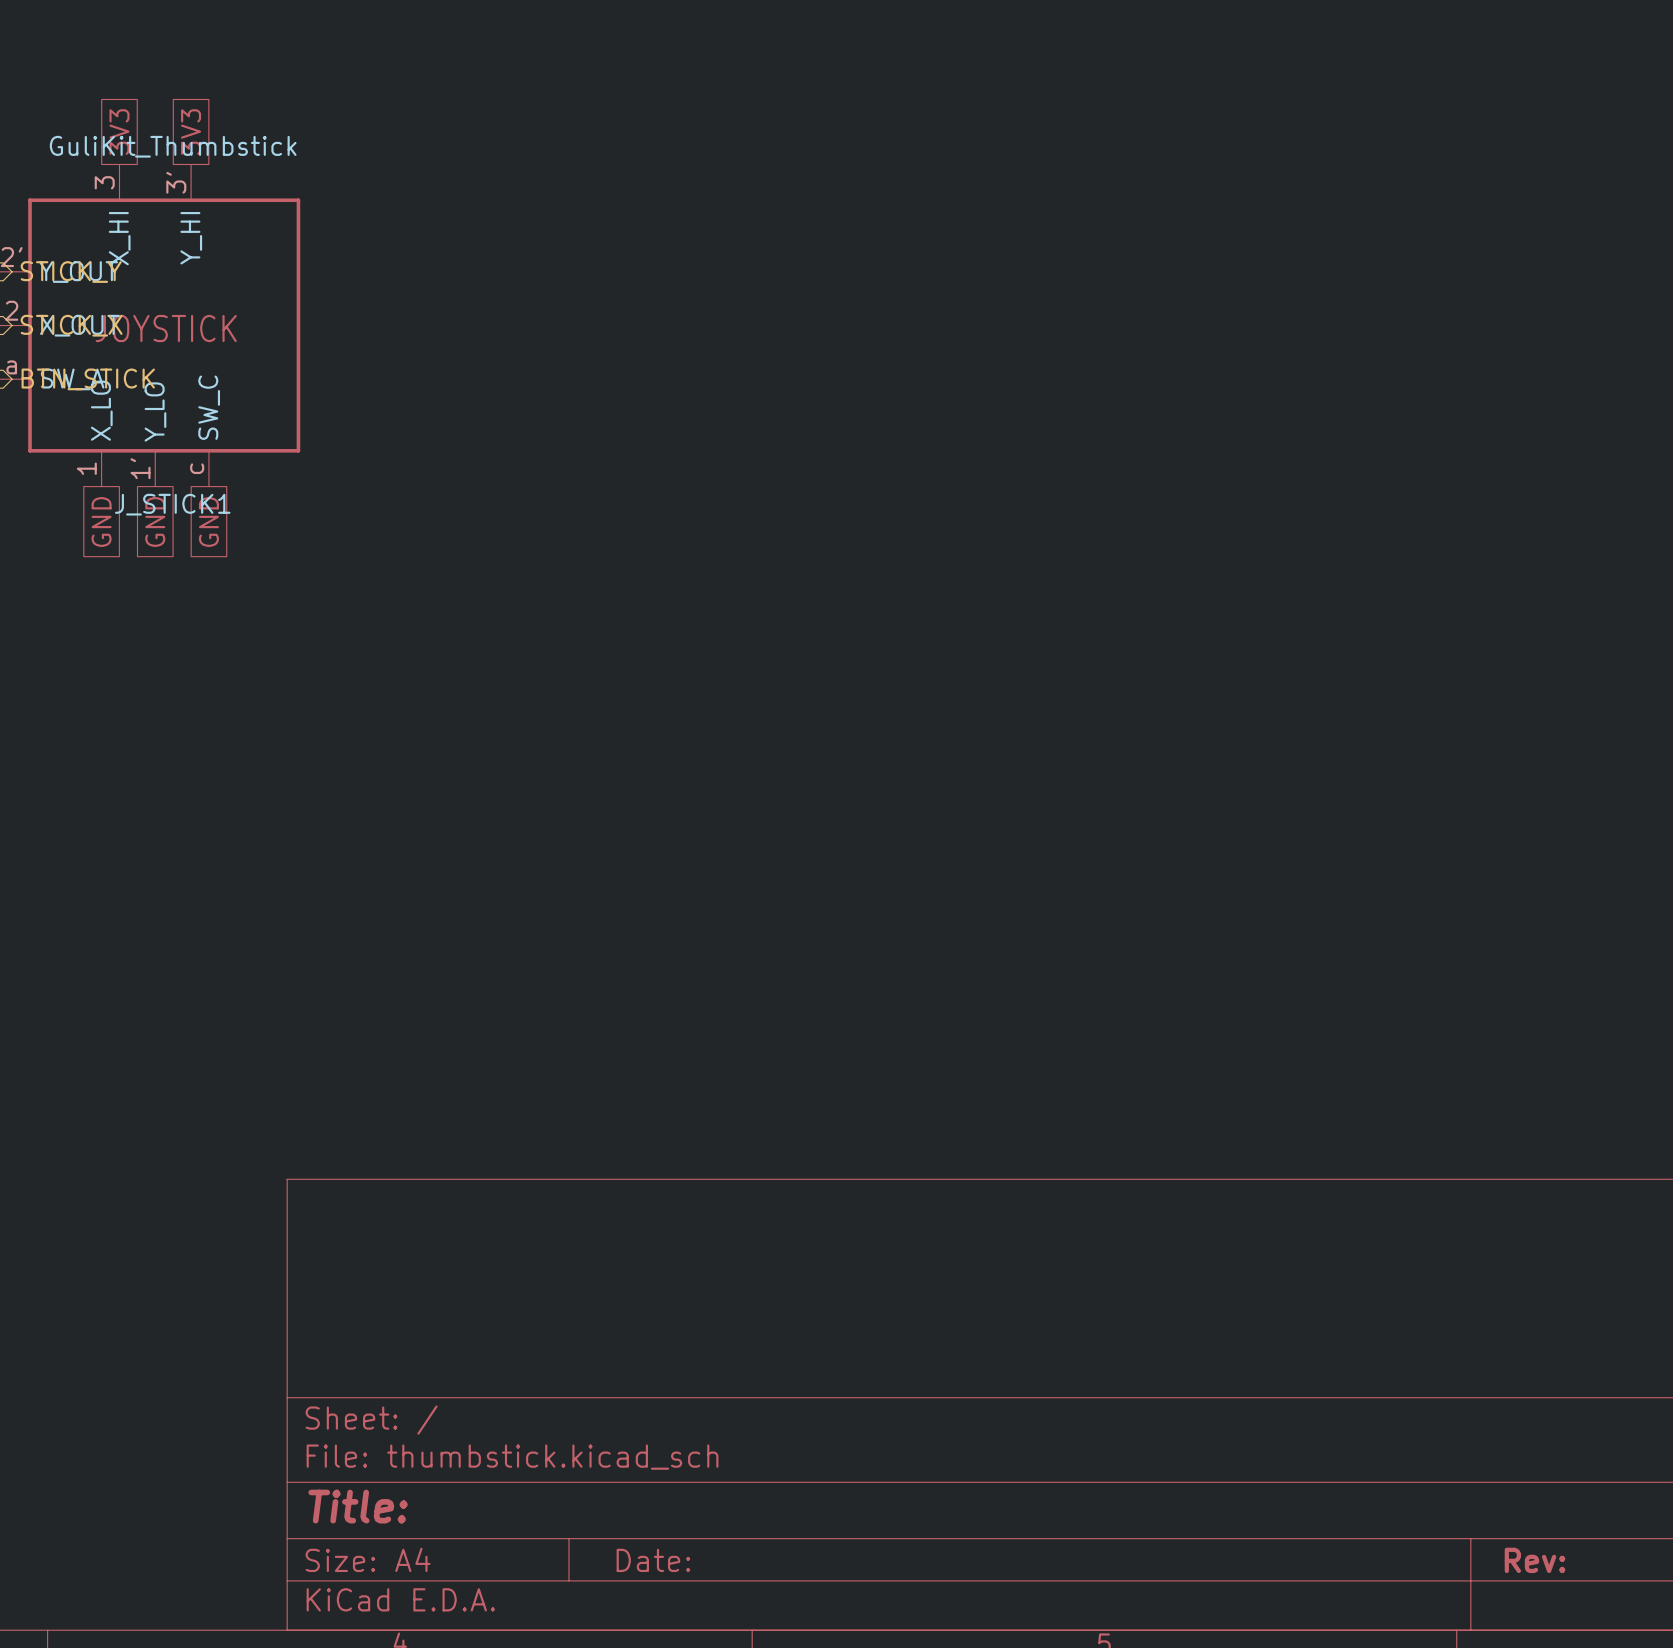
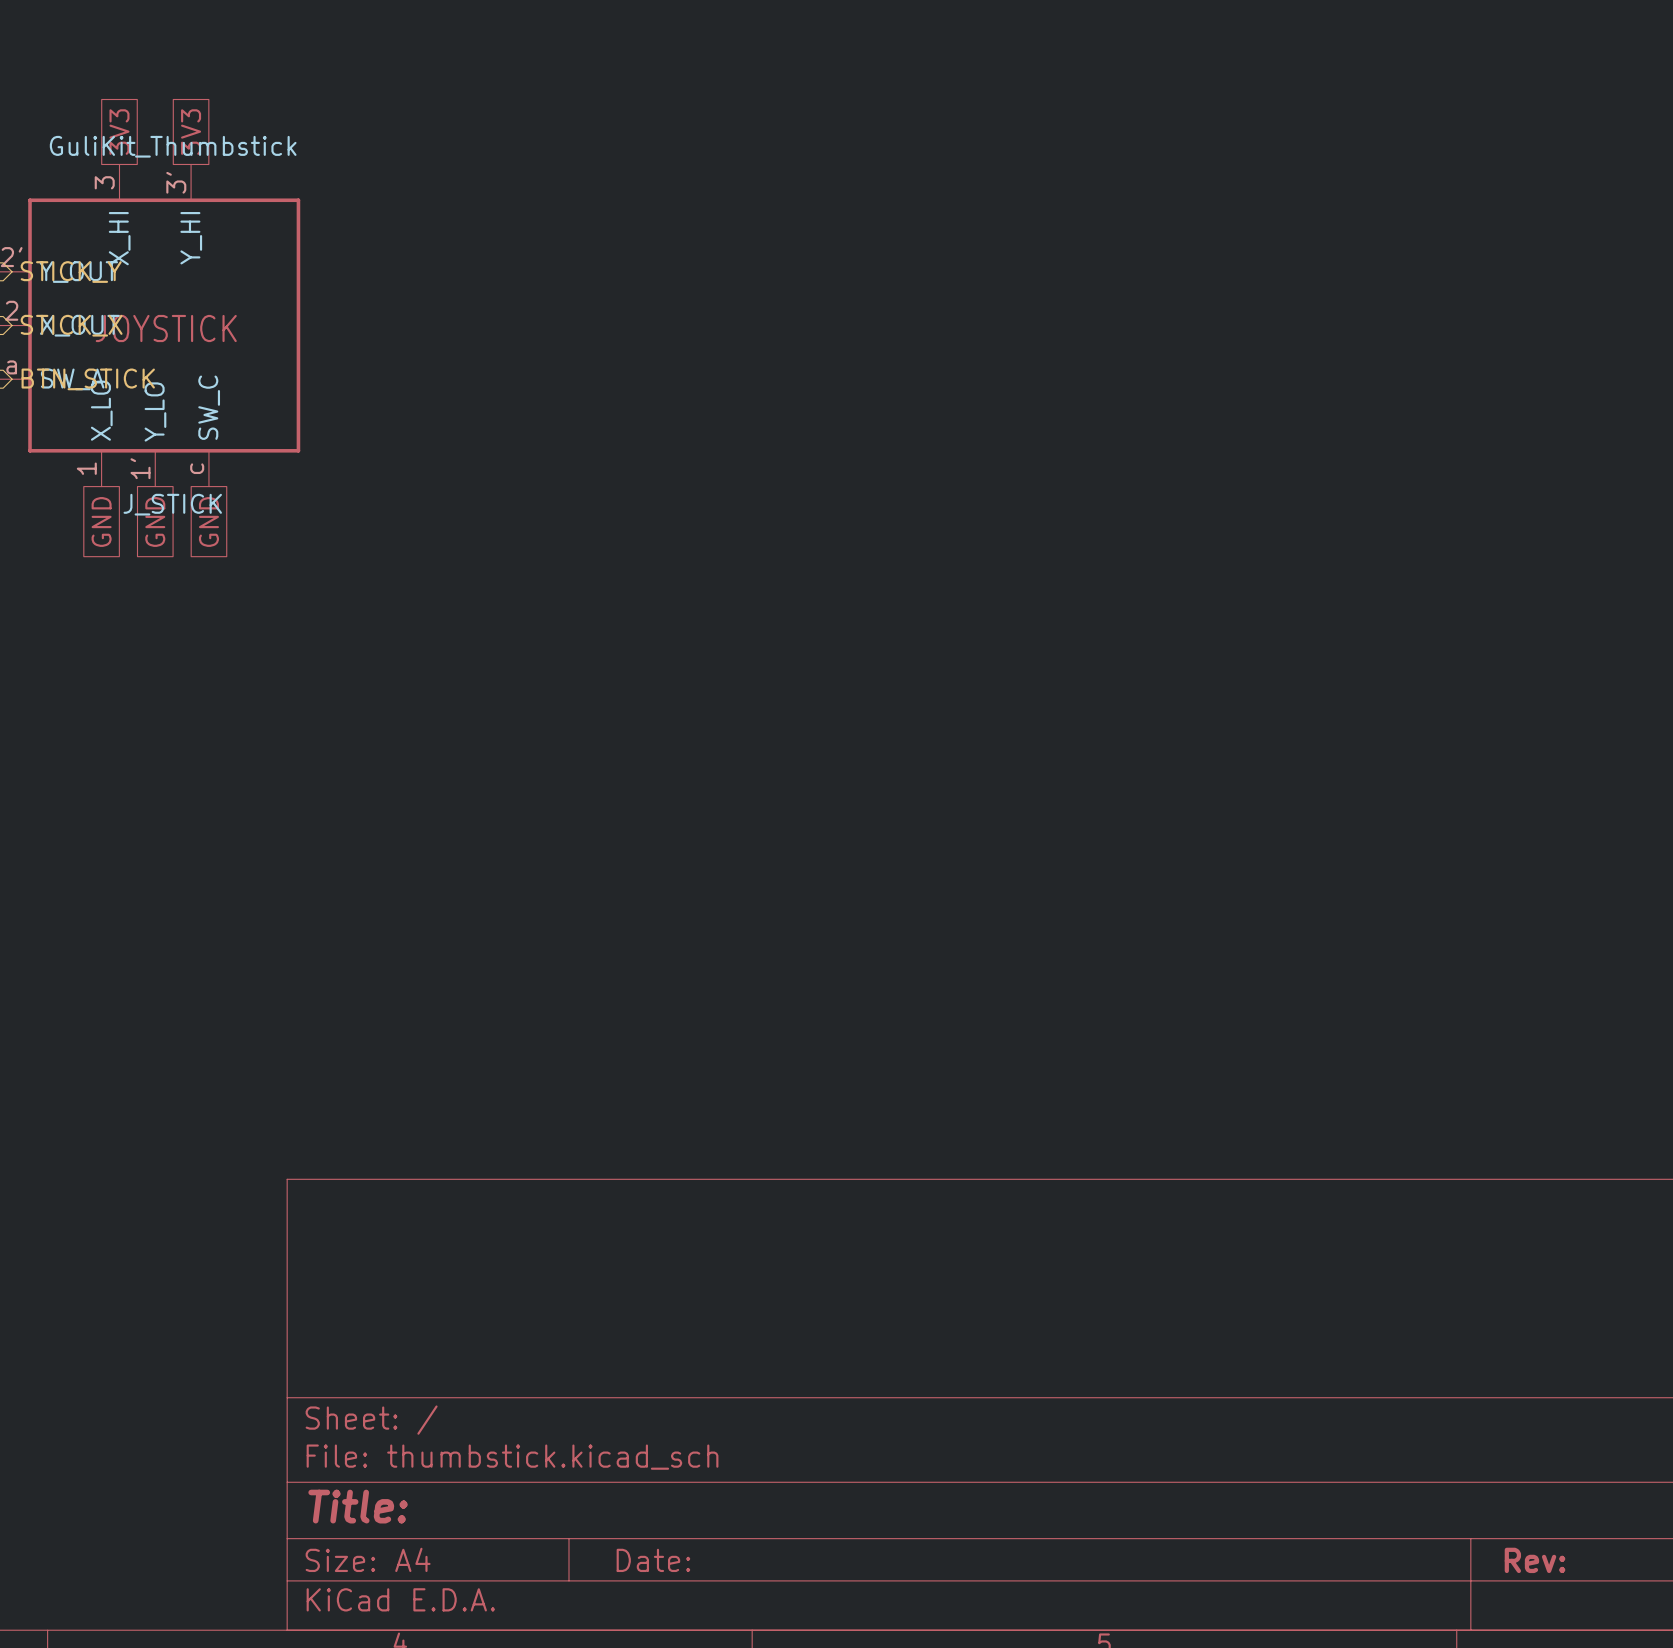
J_STICK1 name: J_STICK1 (172, 504) -> J_STICK (172, 504)

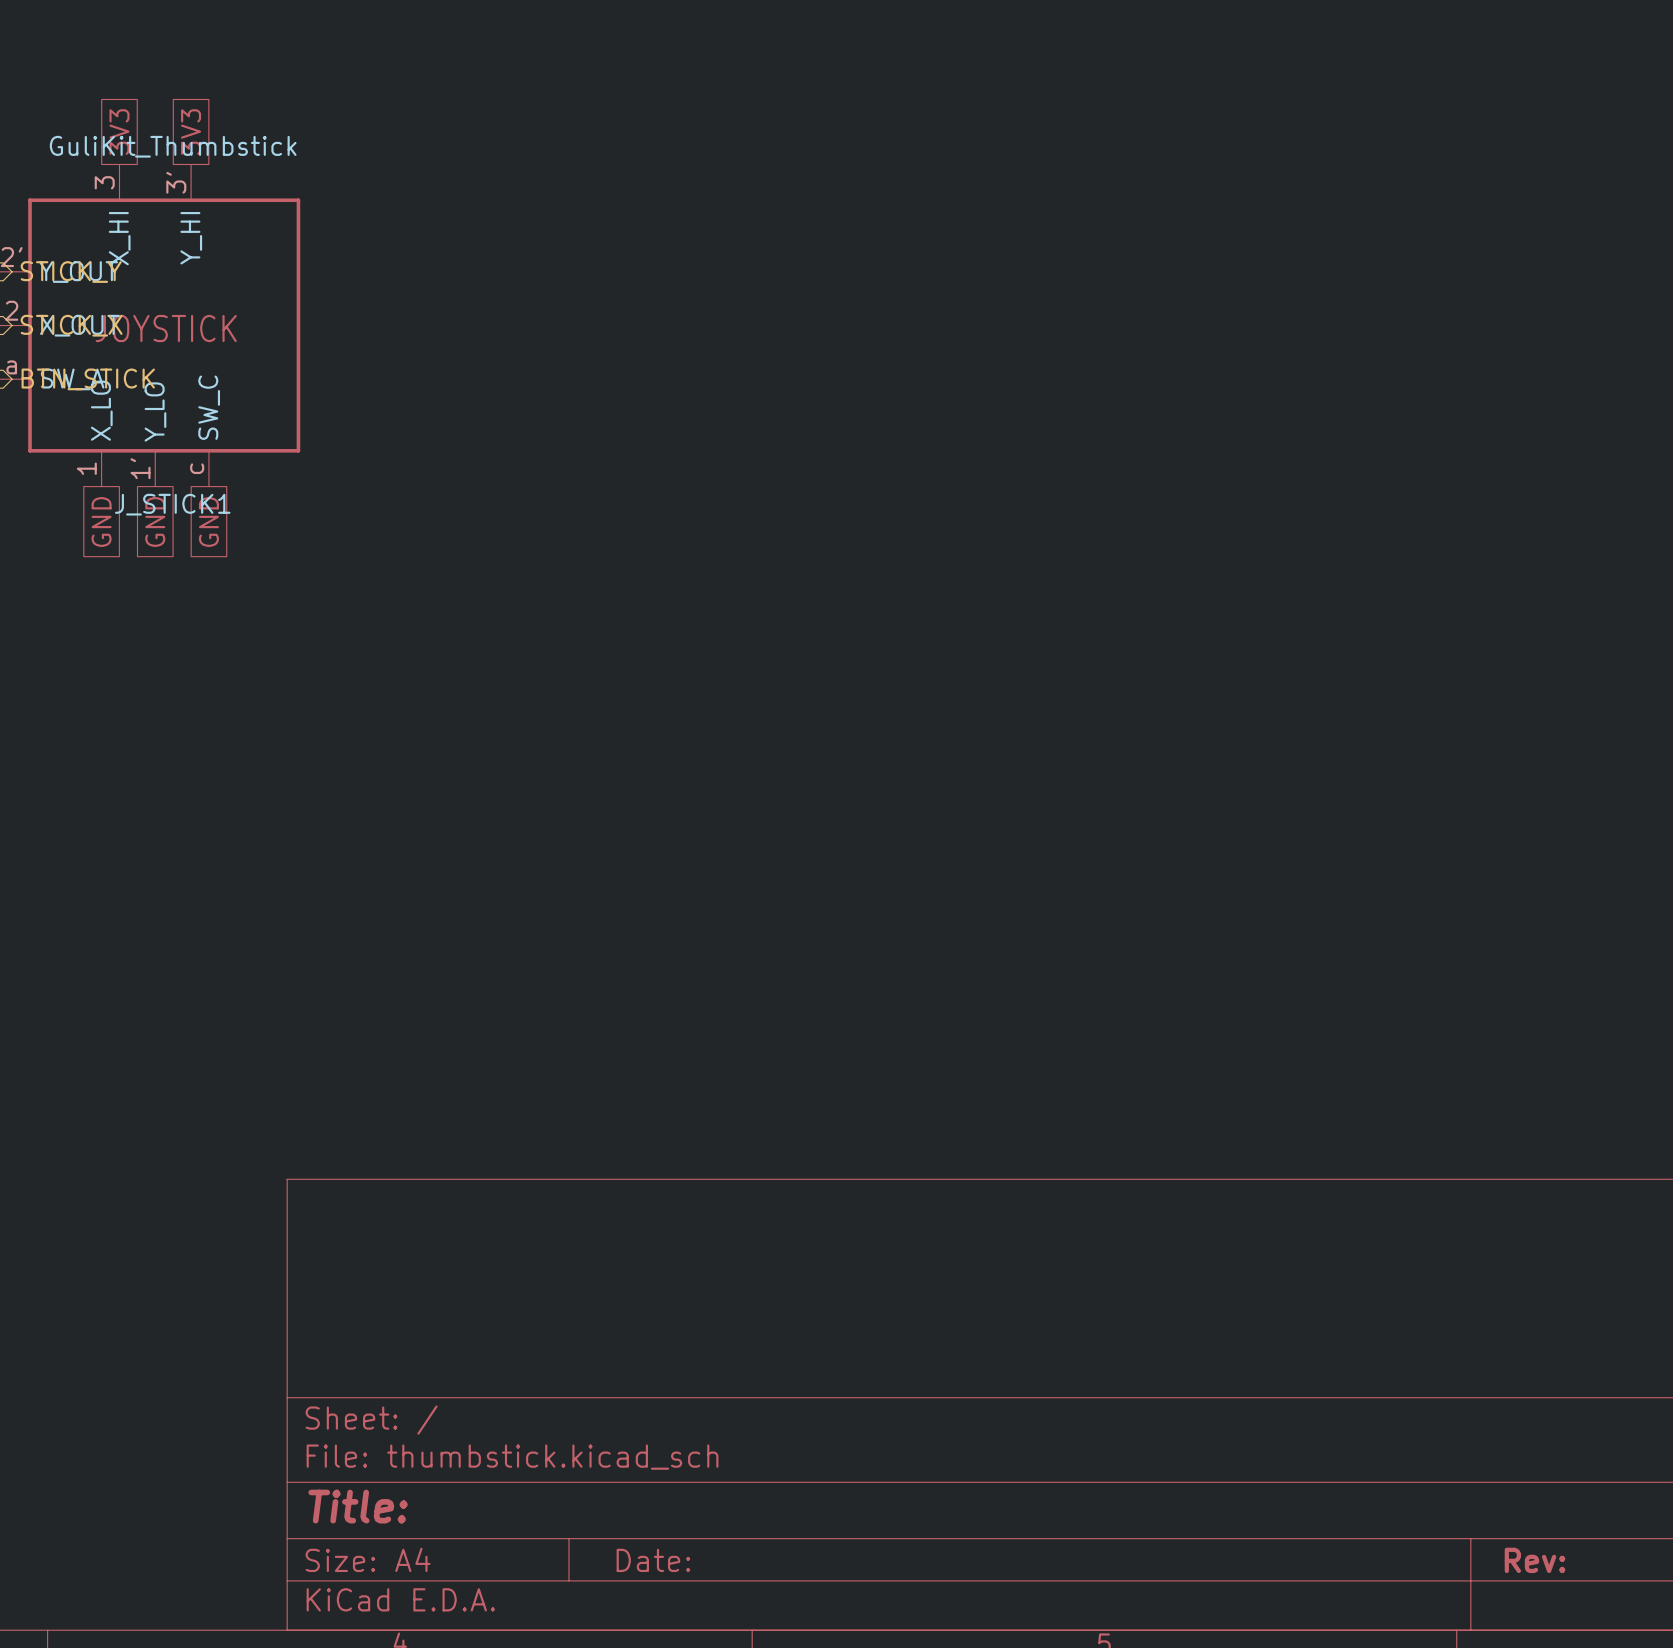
J_STICK name: J_STICK (172, 504) -> J_STICK1 (172, 504)

